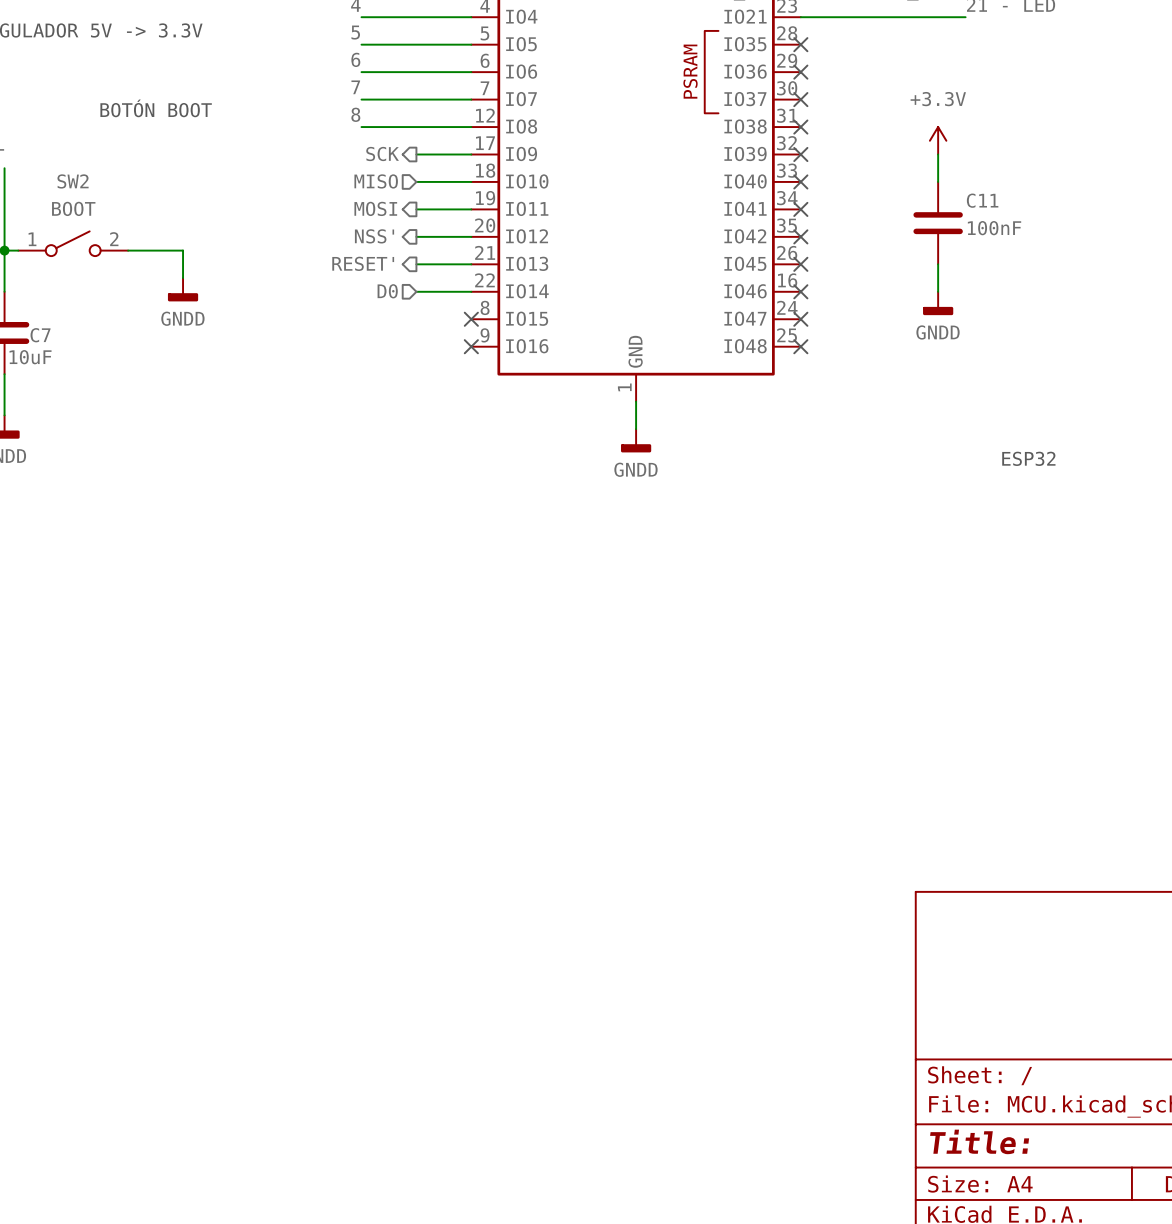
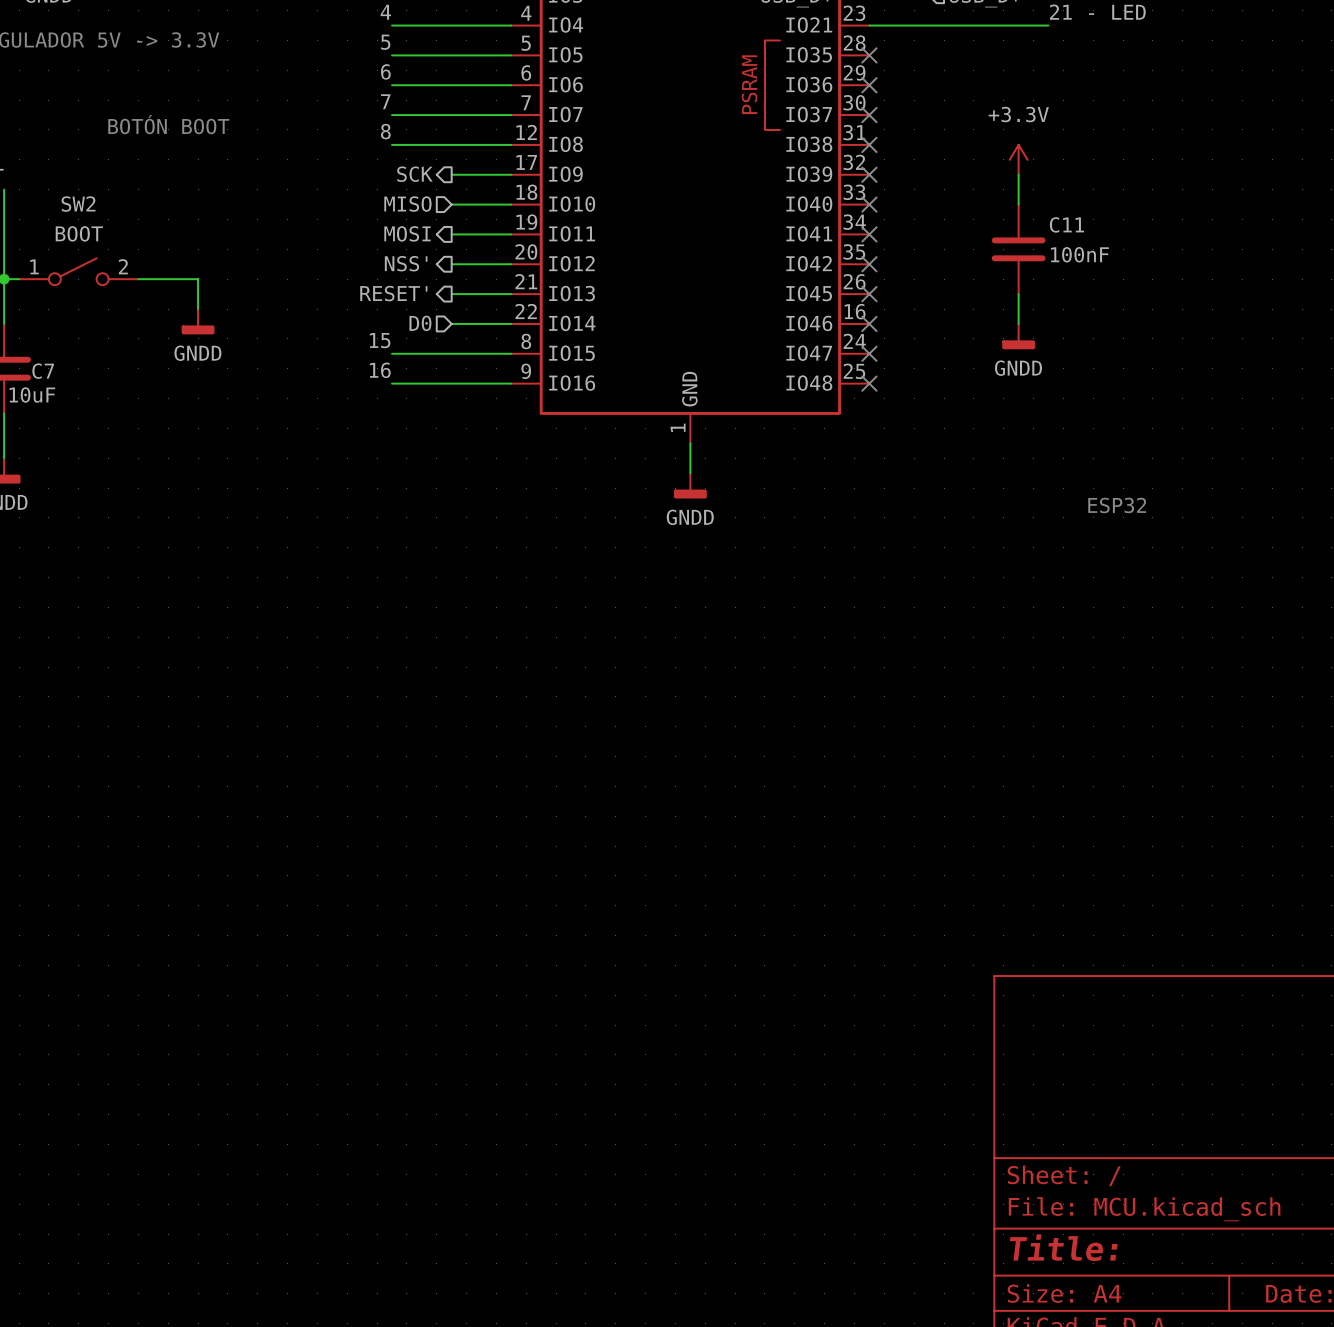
label: none -> 15 (380, 340)
wire: none -> (392, 353) (511, 353)
no-connect mark: (471, 319) -> none
label: none -> 16 (380, 370)
wire: none -> (392, 383) (511, 383)
no-connect mark: (471, 346) -> none

